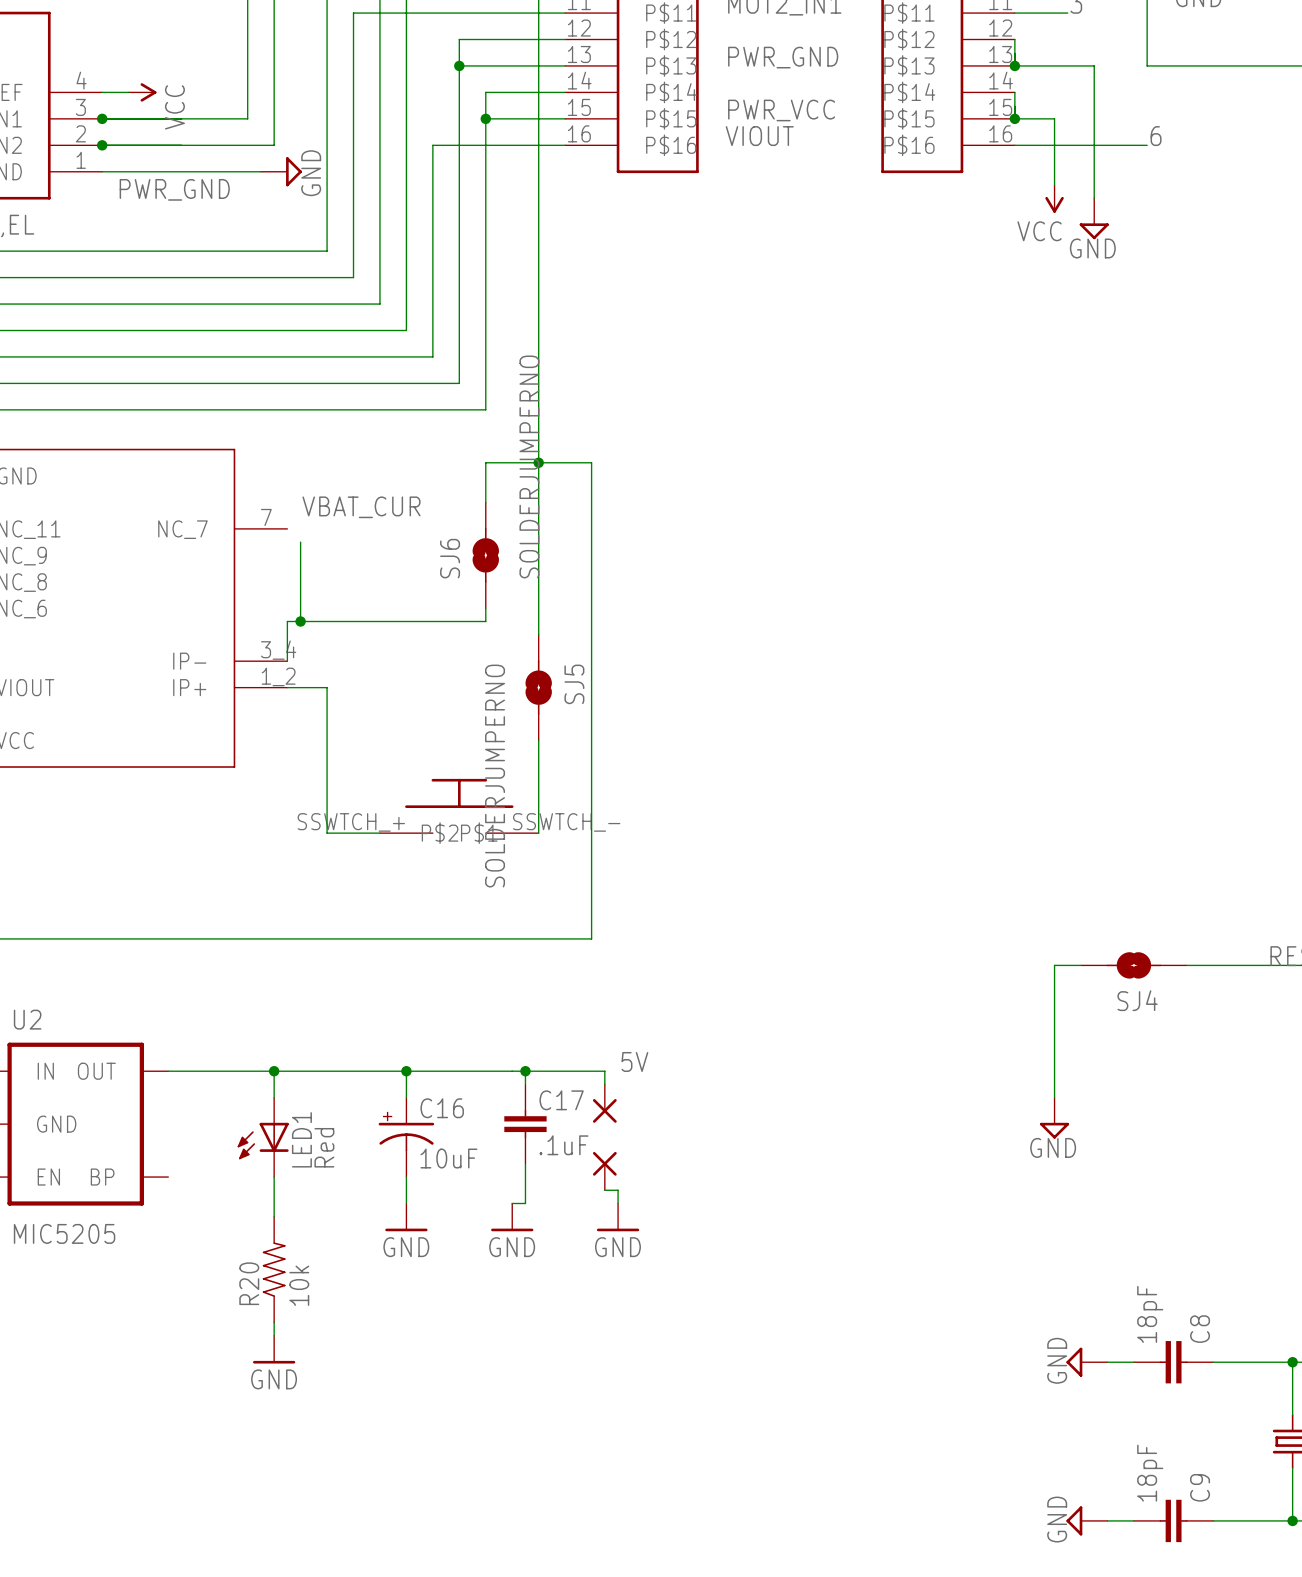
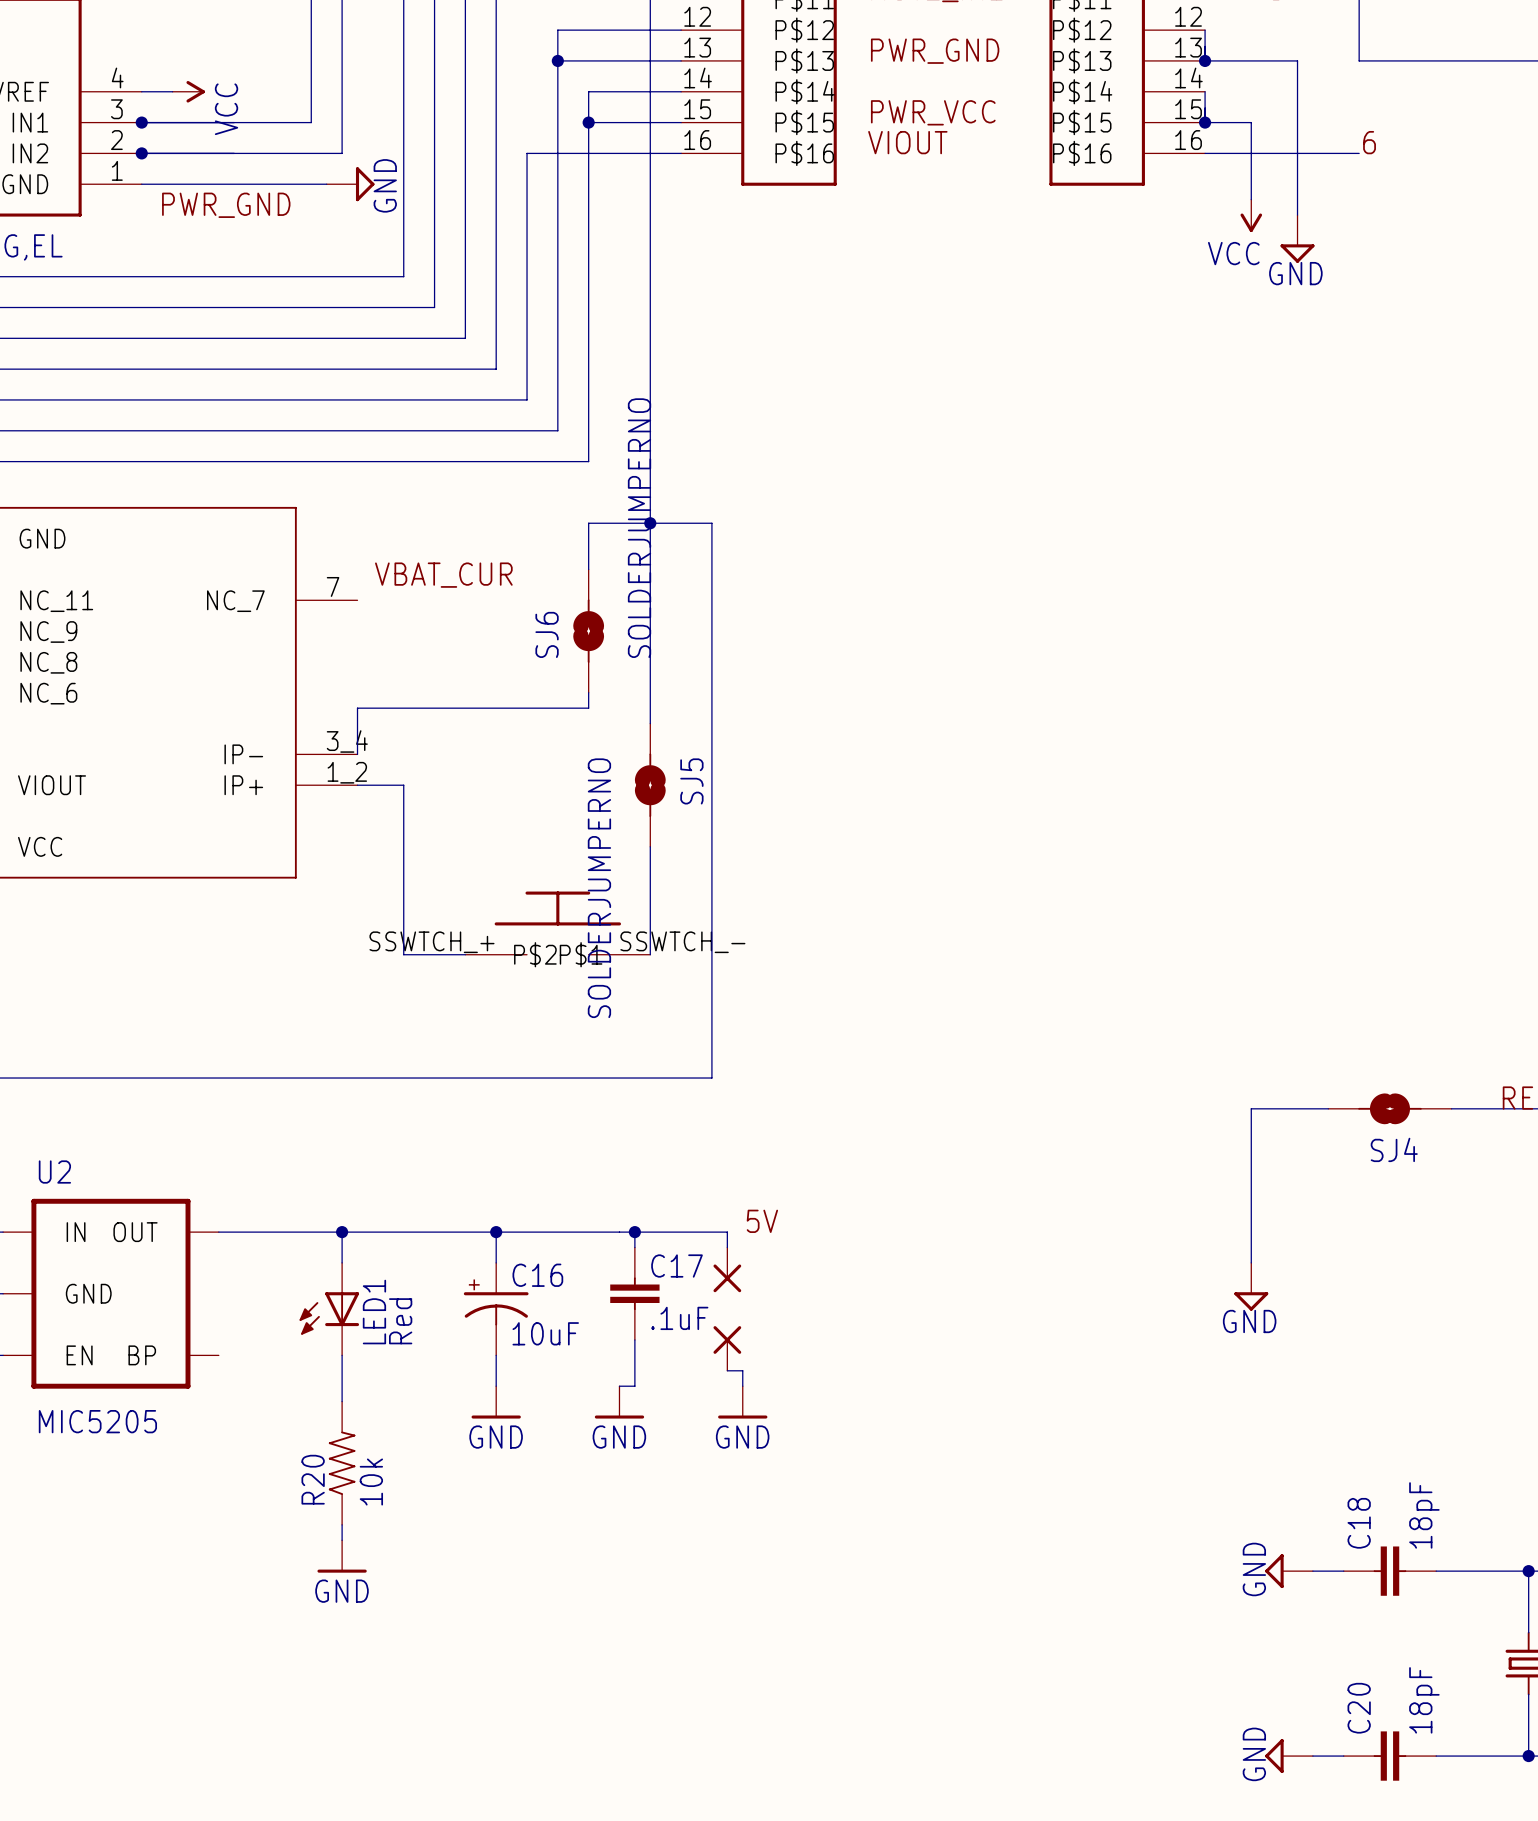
wire: (300, 542) (300, 621) -> none
junction: (300, 621) -> none
SJ4 position: (1133, 965) -> (1389, 1108)
C8 value position: 18pF (1150, 1314) -> 18pF (1424, 1515)
C8 name: C8 (1200, 1329) -> C18 (1359, 1523)
C9 value position: 18pF (1150, 1473) -> 18pF (1424, 1700)
C9 name: C9 (1200, 1487) -> C20 (1359, 1708)

